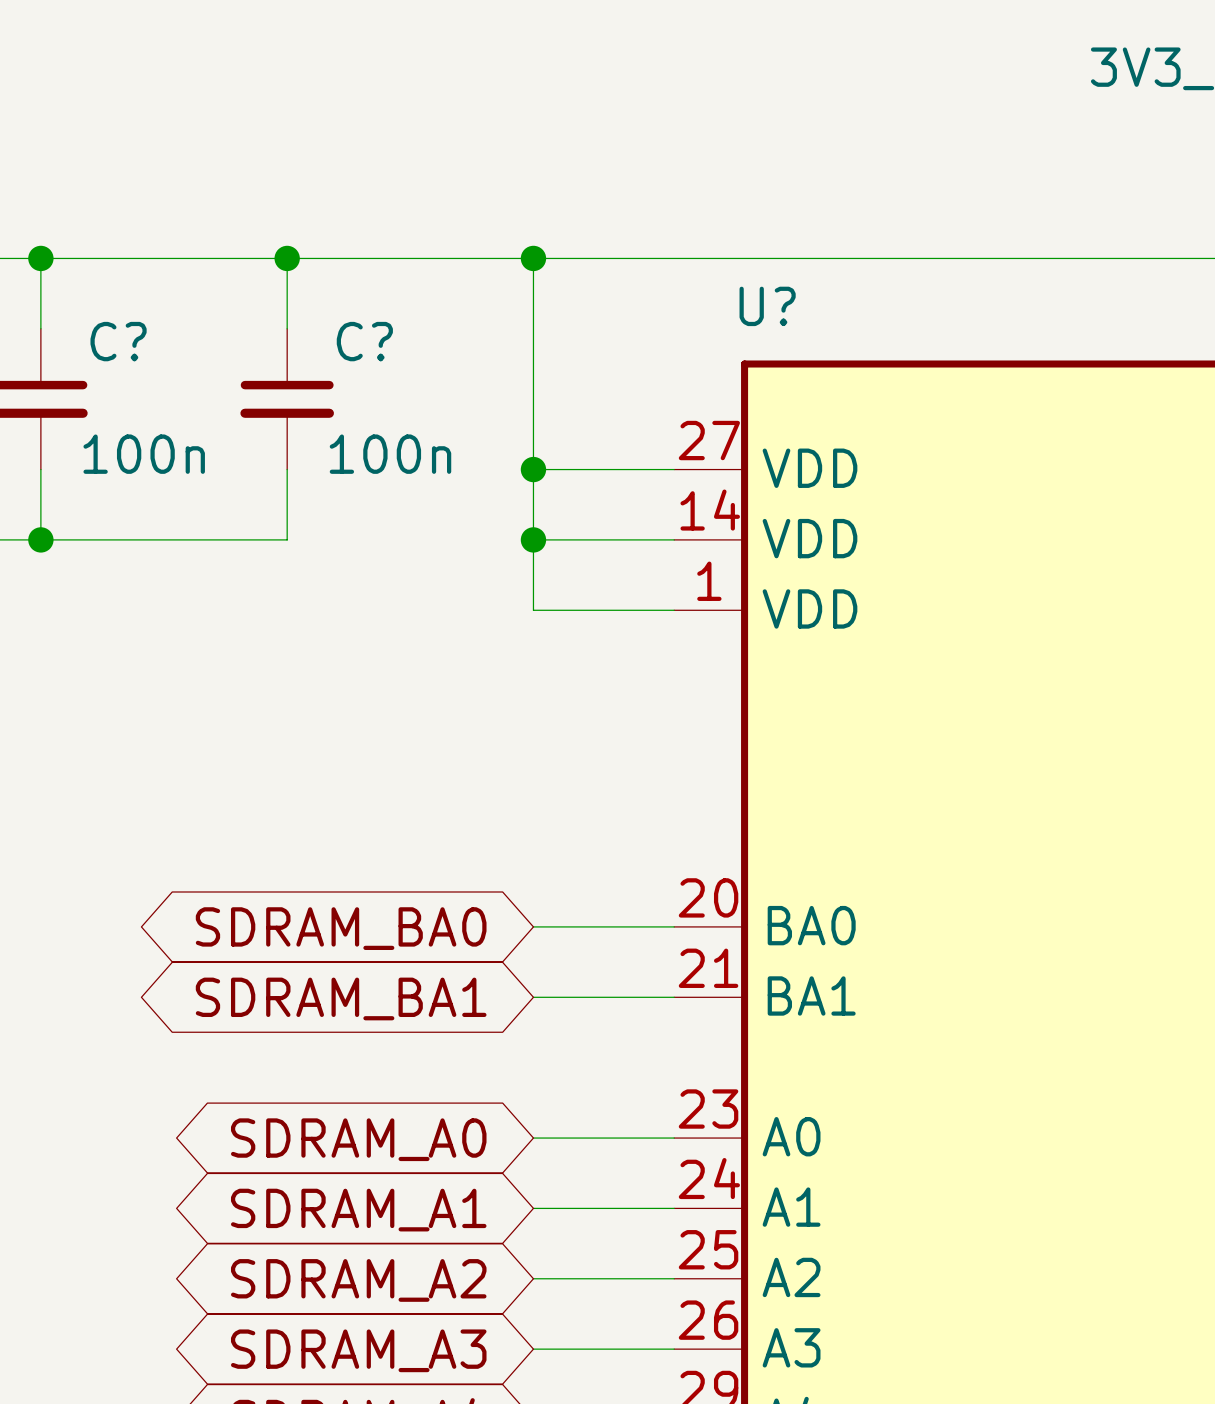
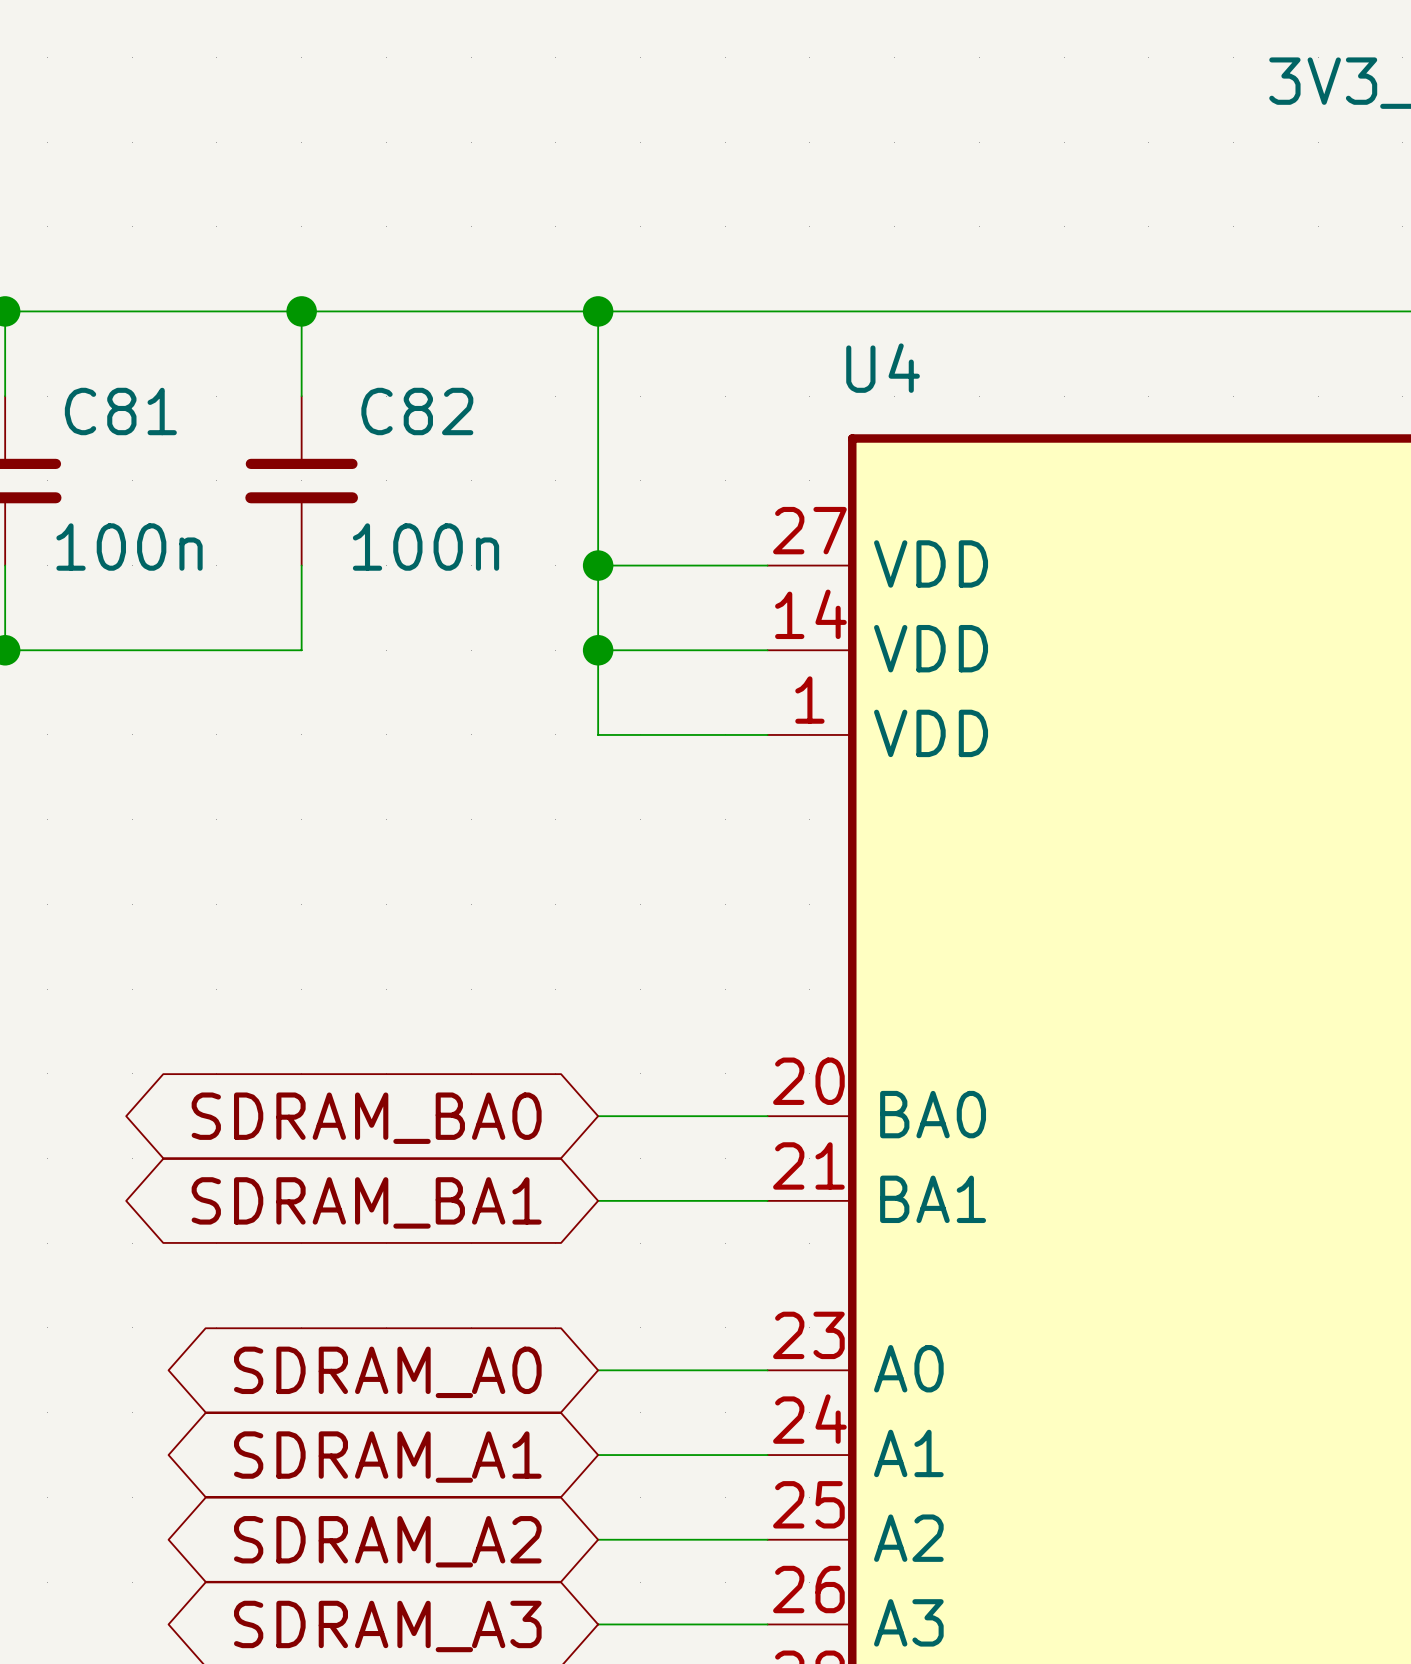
U? name: U? (767, 306) -> U4 (883, 368)
C? name: C? (118, 341) -> C81 (120, 411)
C? name: C? (364, 341) -> C82 (417, 411)

